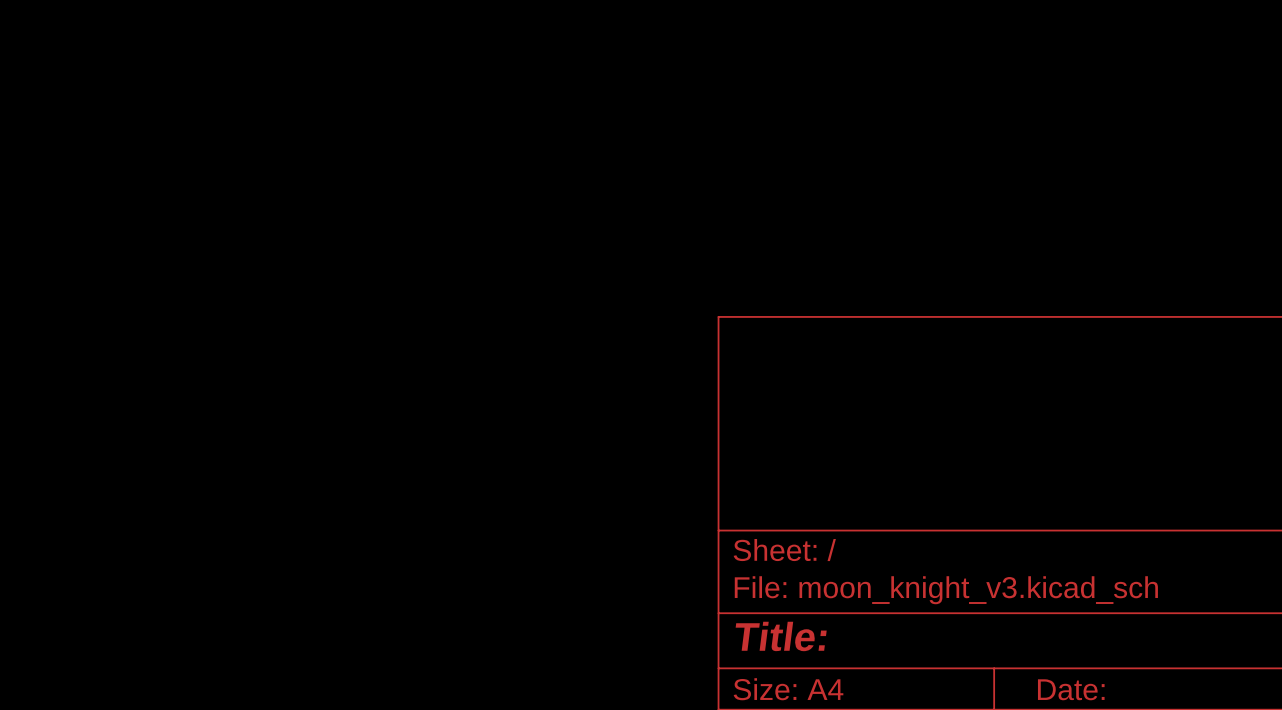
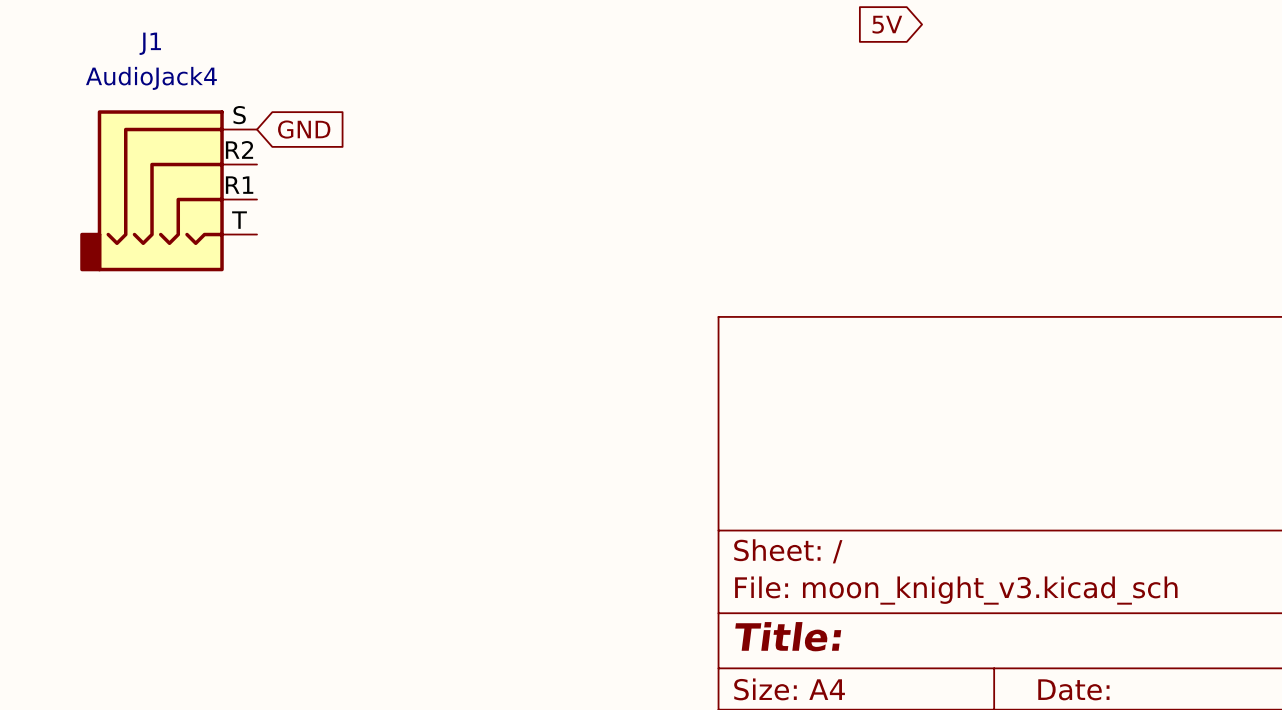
global label: none -> 5V (887, 24)
global label: none -> GND (304, 129)
J1: none -> AudioJack4 (168, 190)

